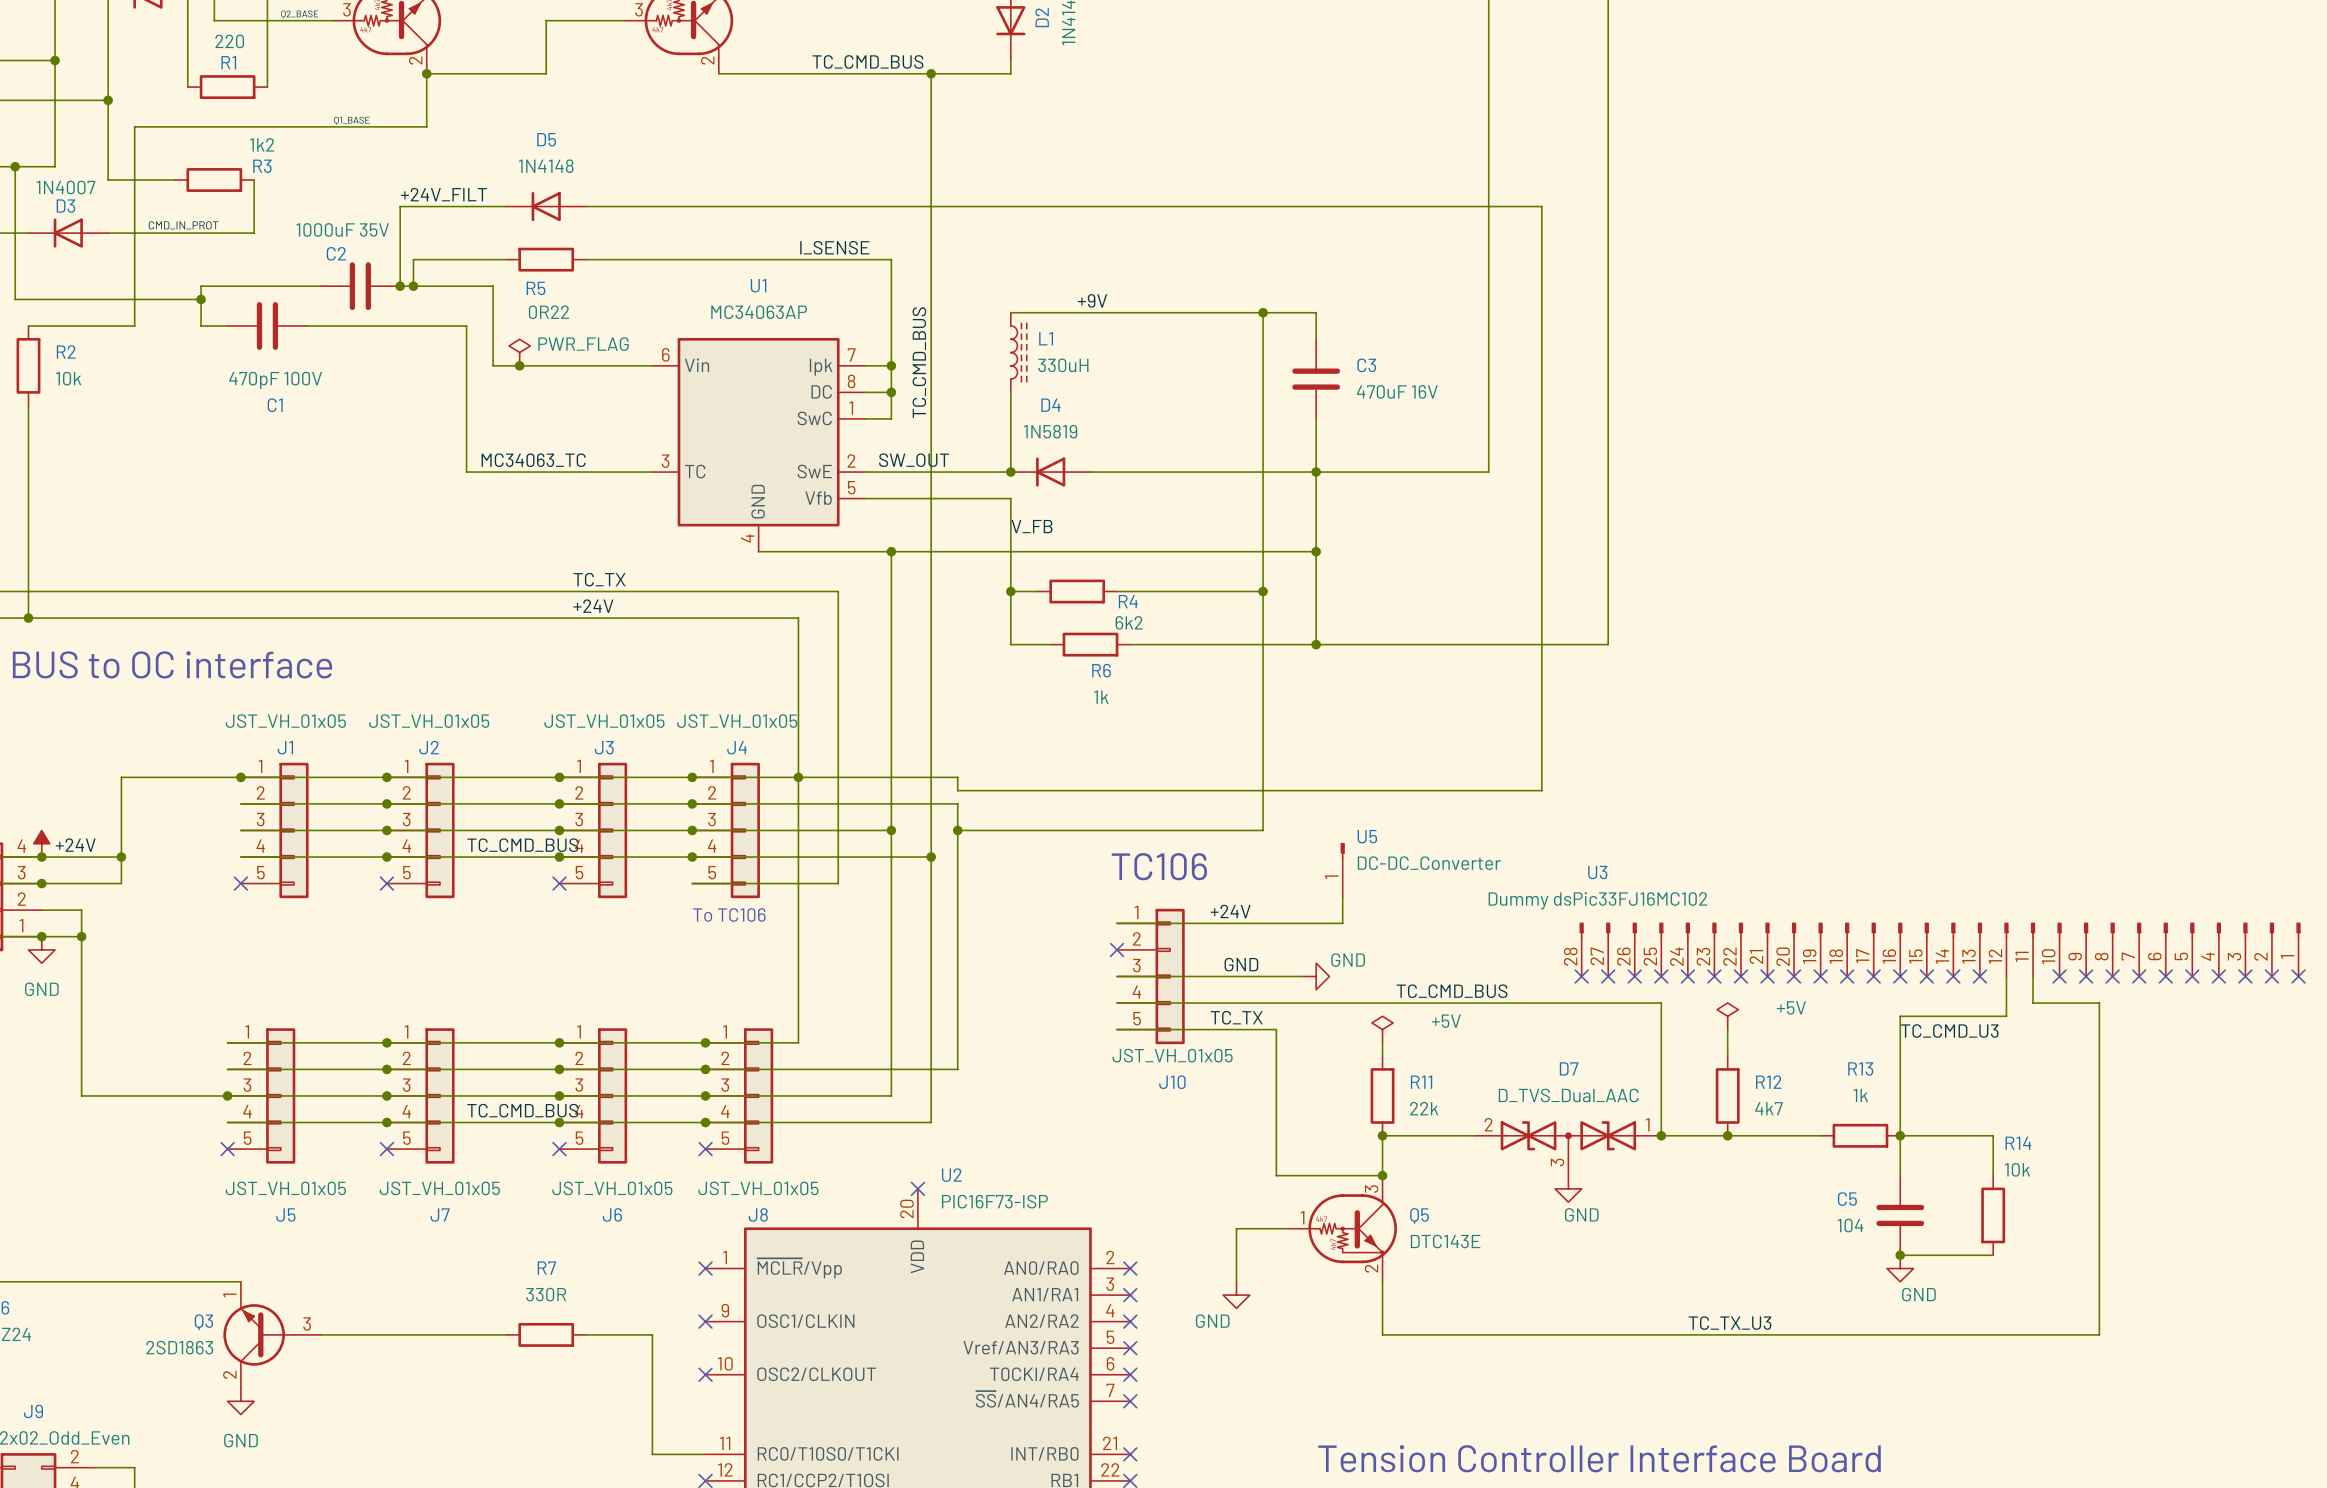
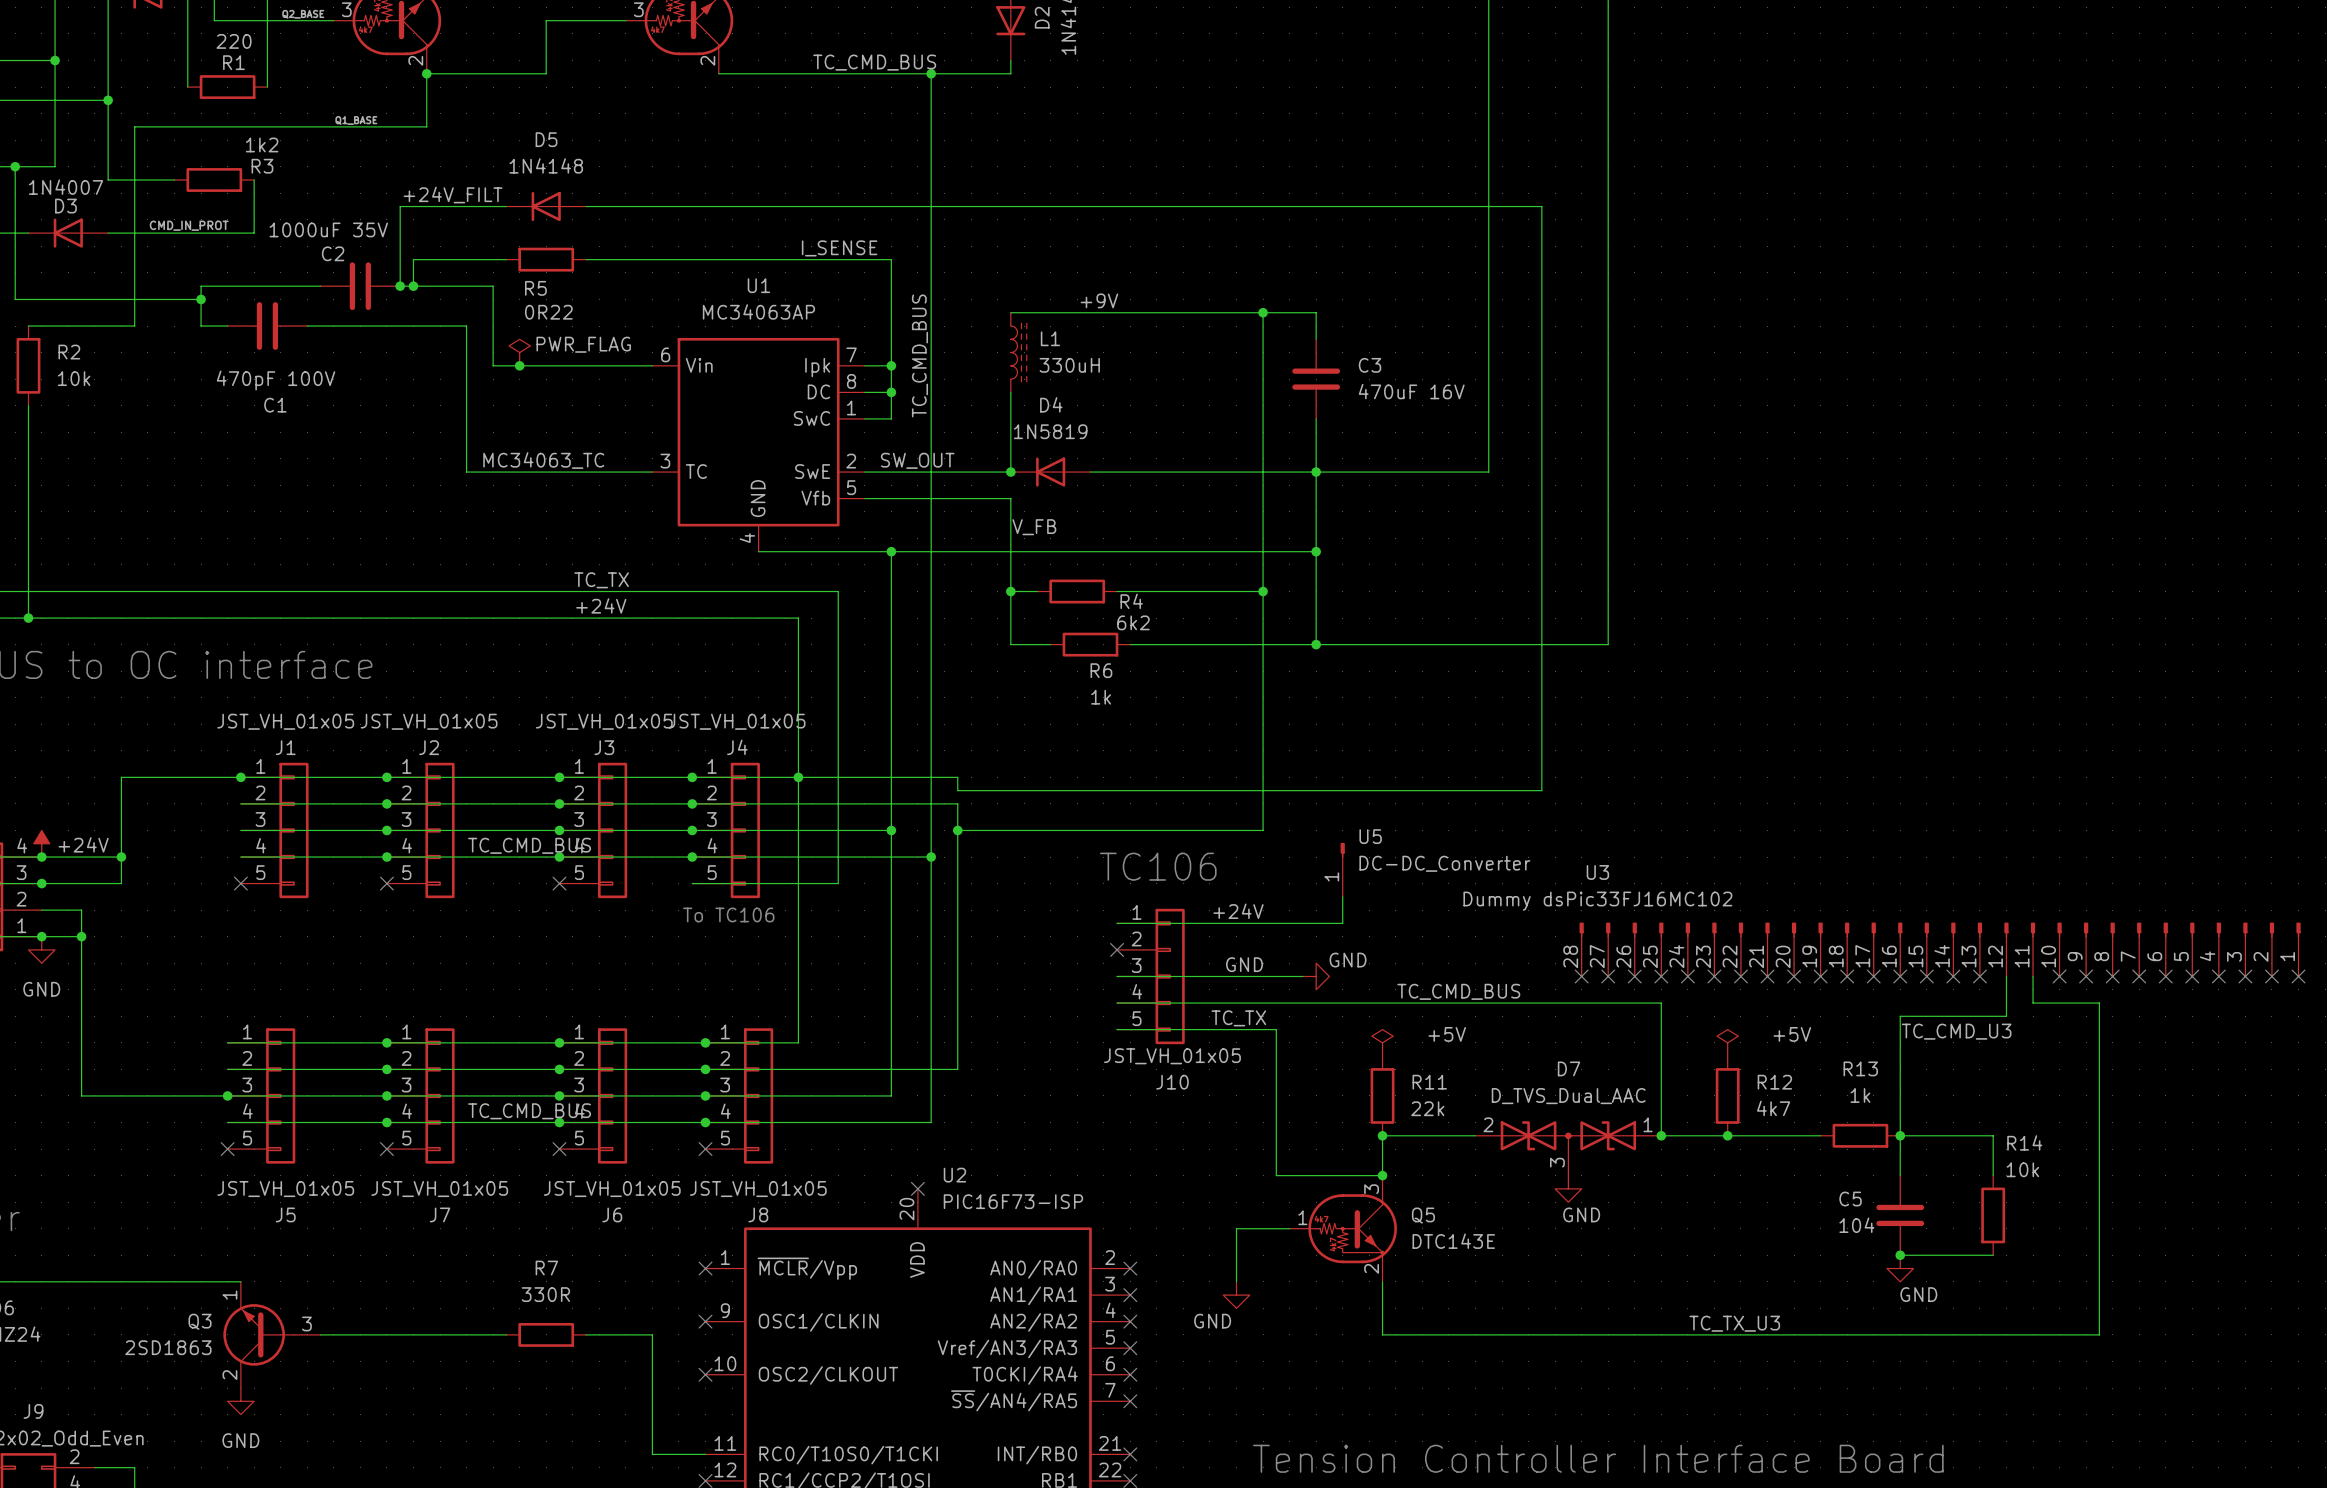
power symbol position: +5V (1727, 1016) -> +5V (1727, 1042)
power symbol position: +5V (1382, 1029) -> +5V (1382, 1042)

